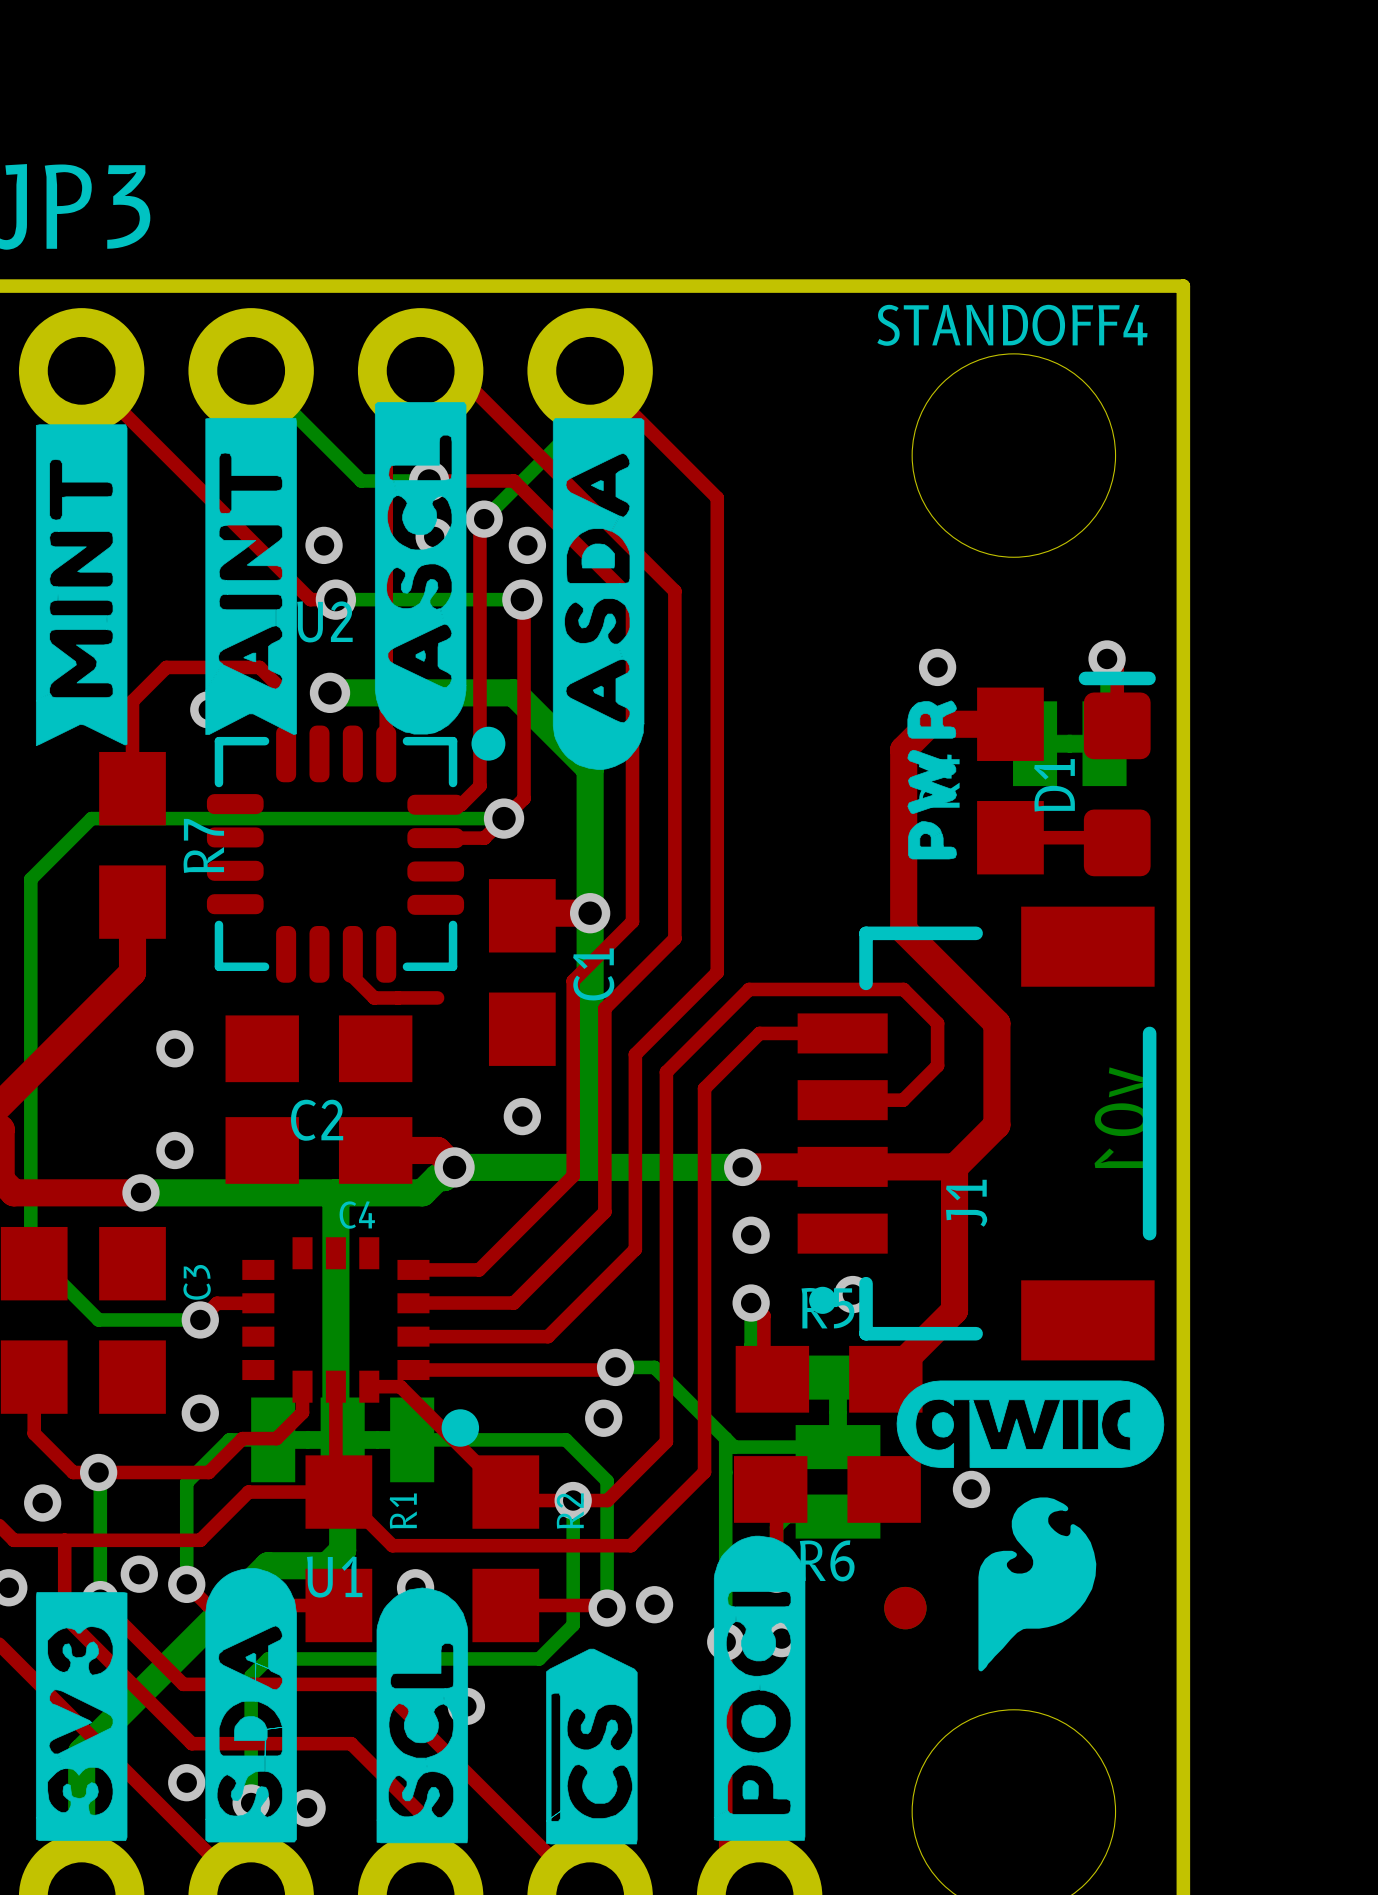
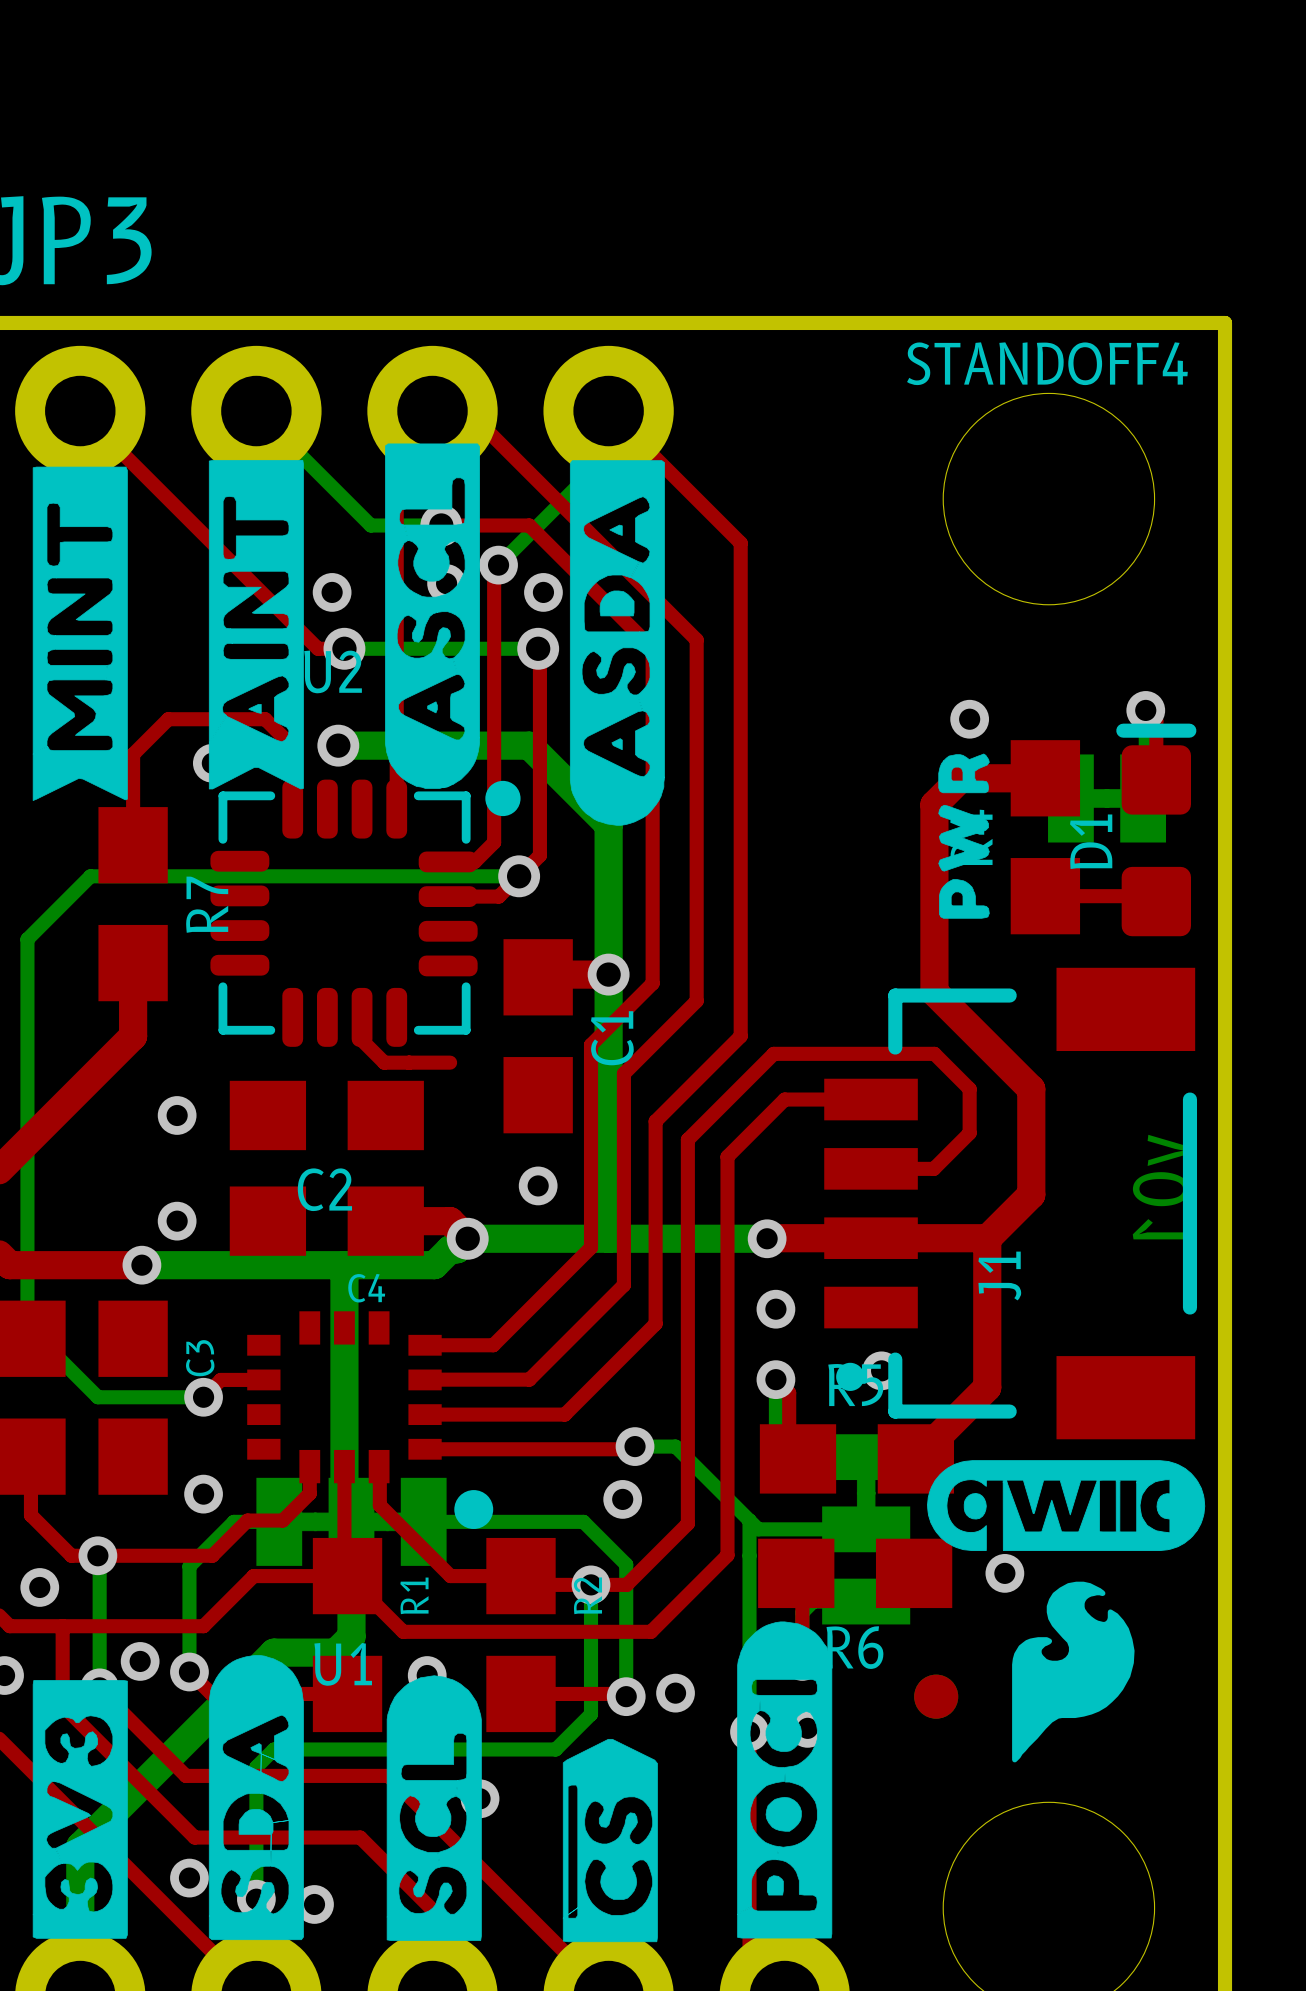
top track: (369, 1386) (400, 1386) (505, 1492) -> (379, 1467) (379, 1505) (450, 1576) (521, 1576)

